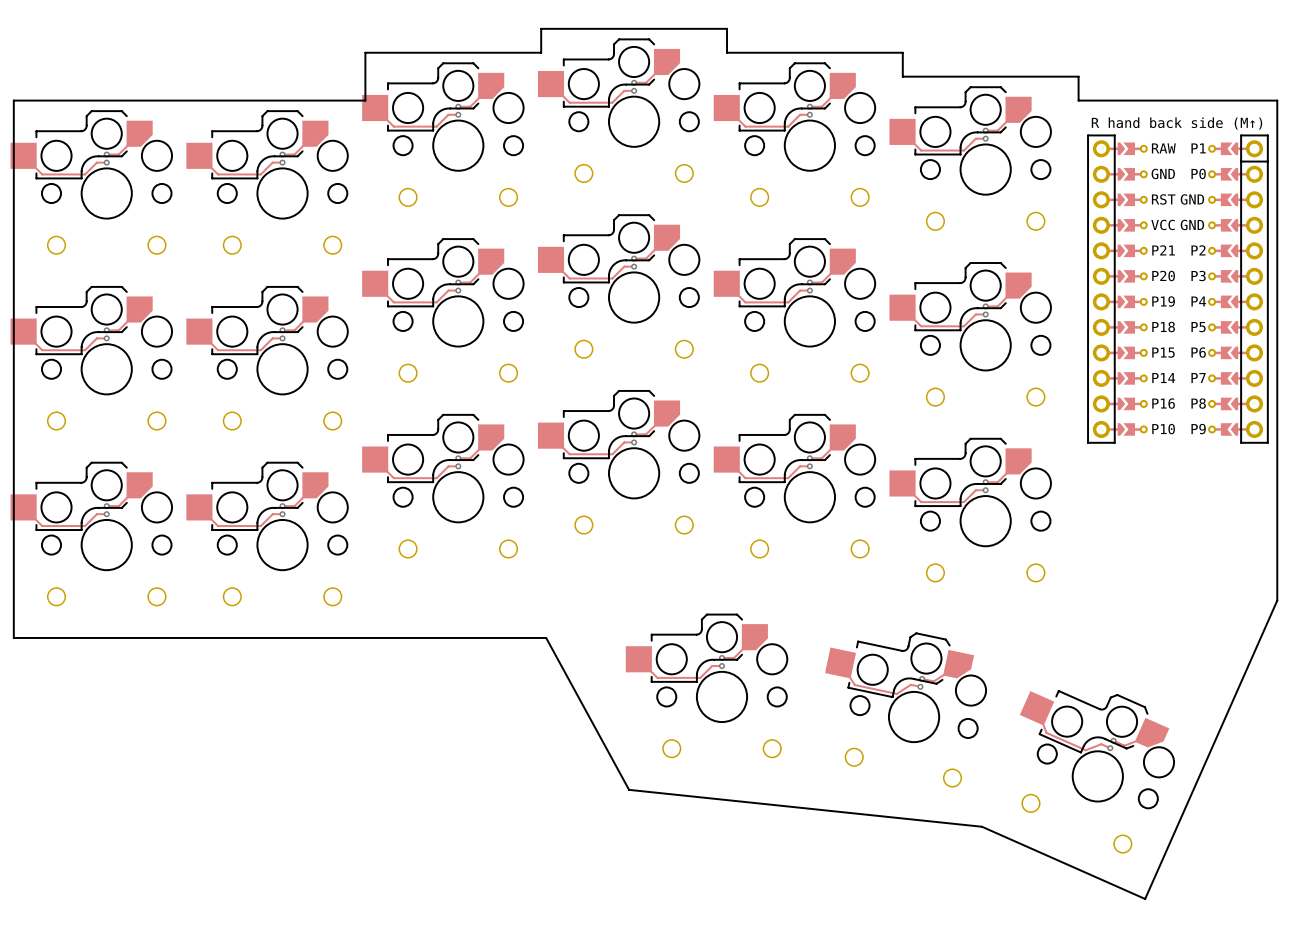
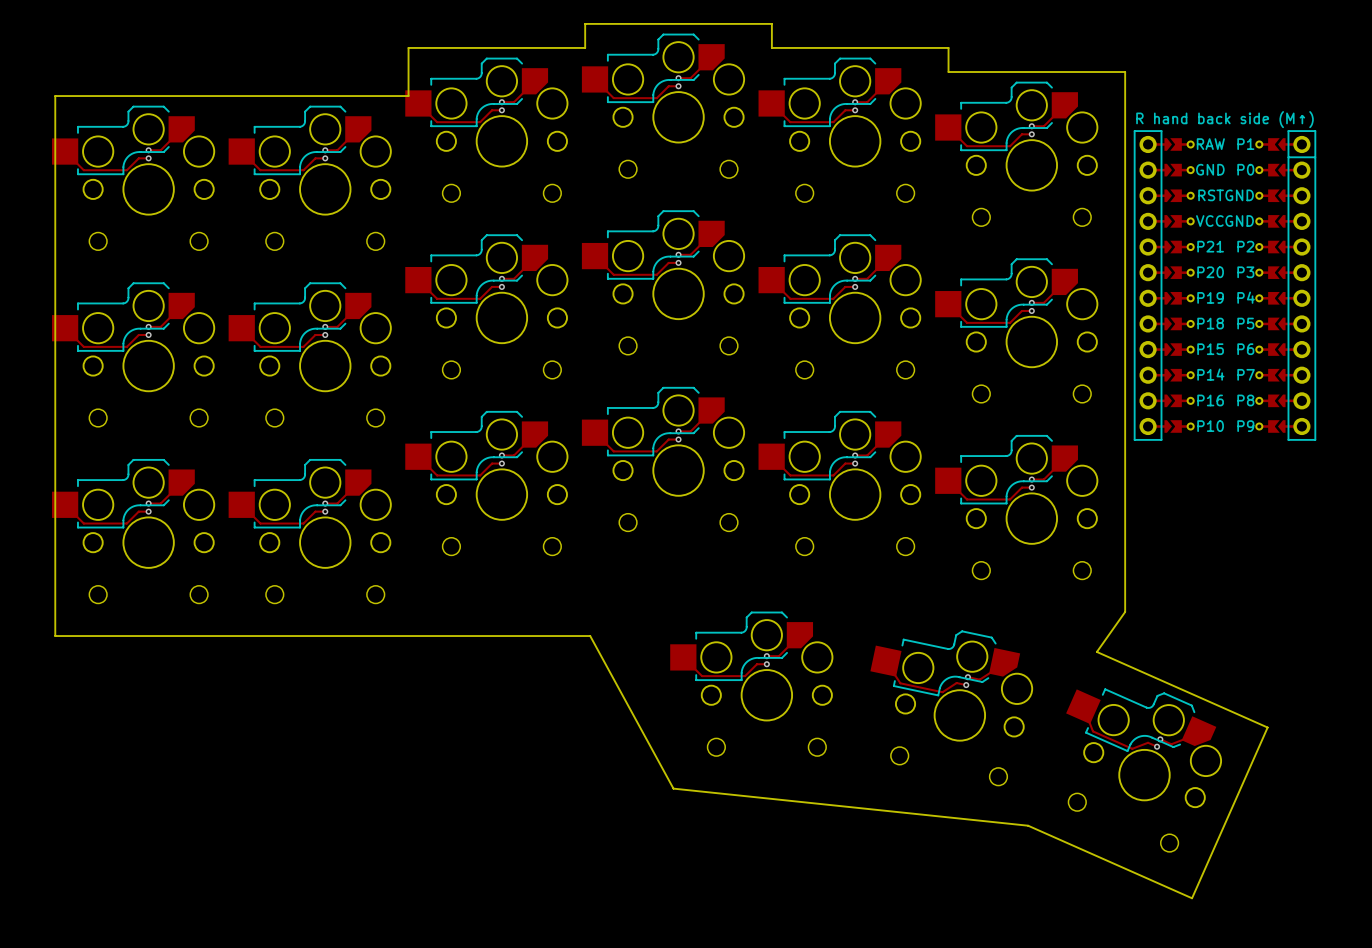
board edge: (1078, 100) (1277, 100) (1277, 600) (1220, 729) -> (1125, 96) (1125, 611) (1096, 651) (1267, 727)

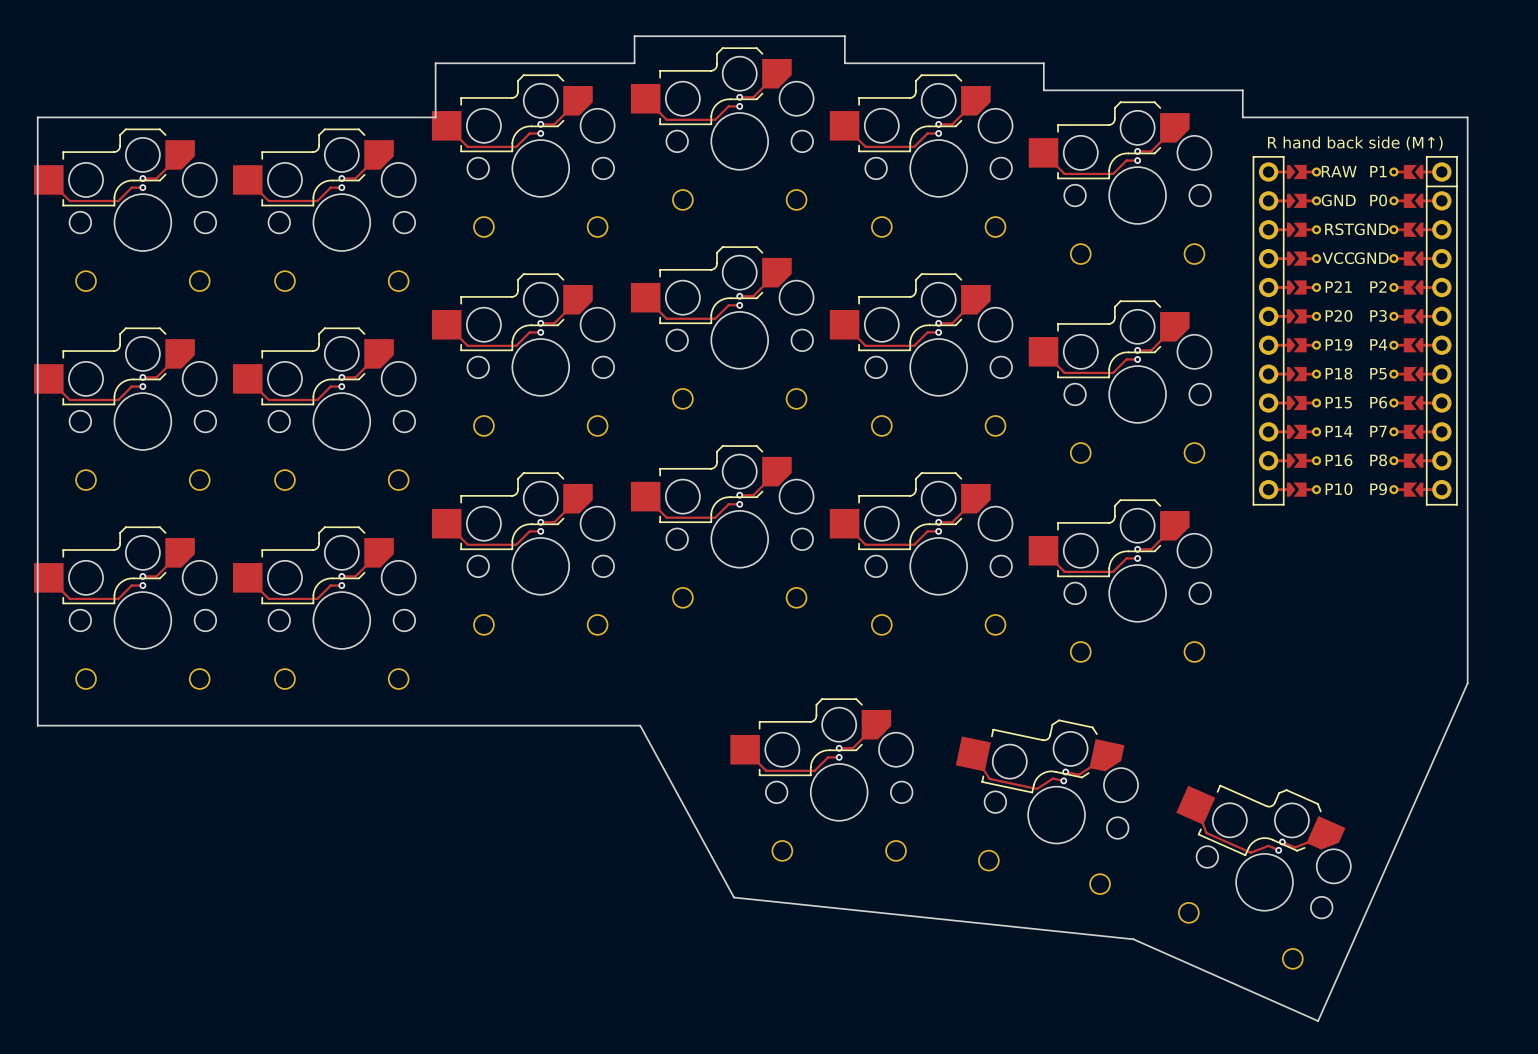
board edge: (1125, 96) (1125, 611) (1096, 651) (1267, 727) -> (1242, 117) (1467, 117) (1467, 683) (1403, 828)

